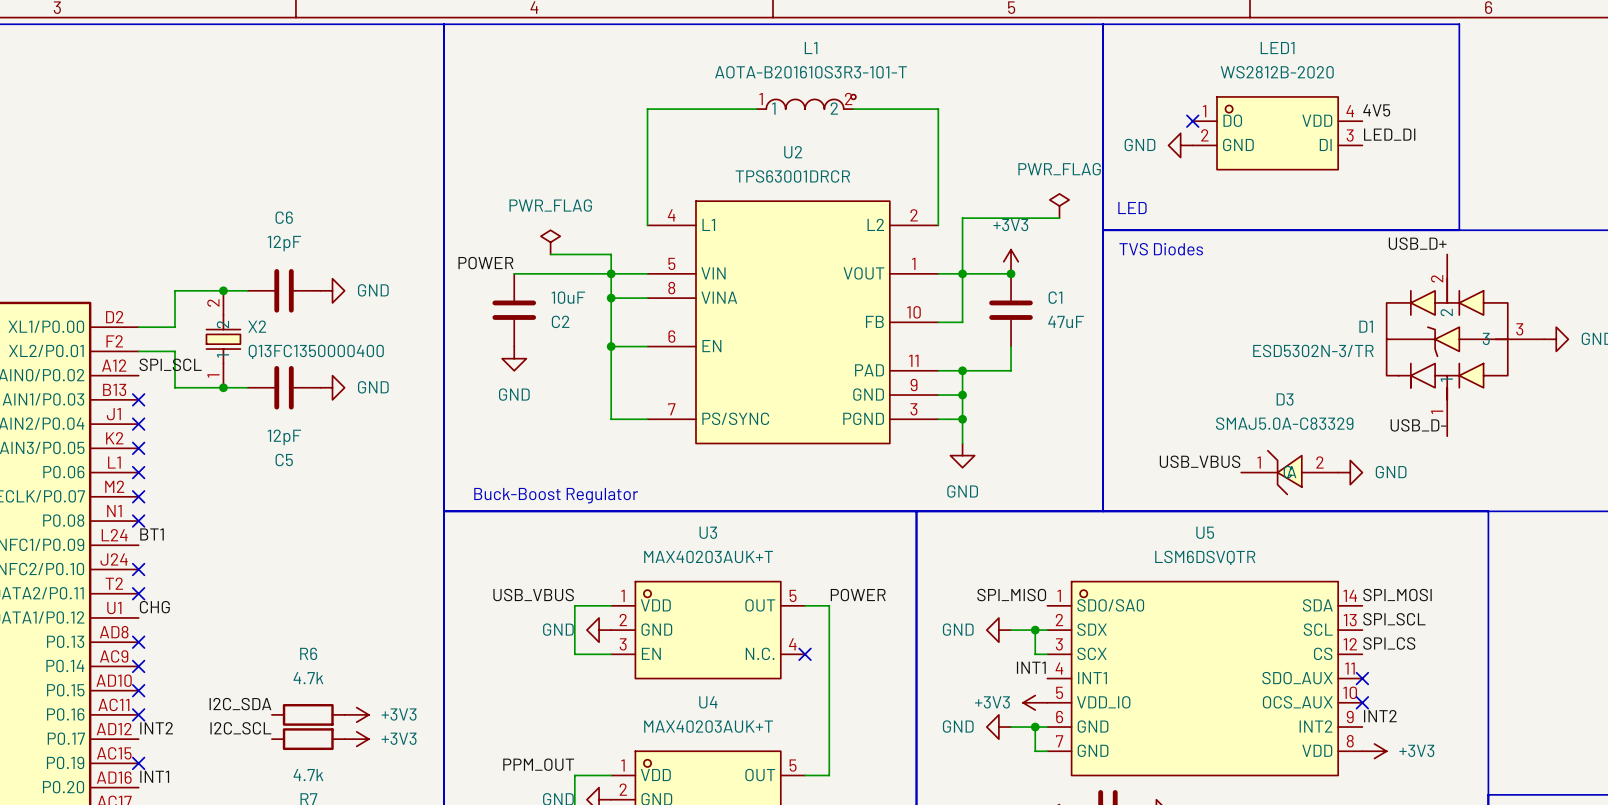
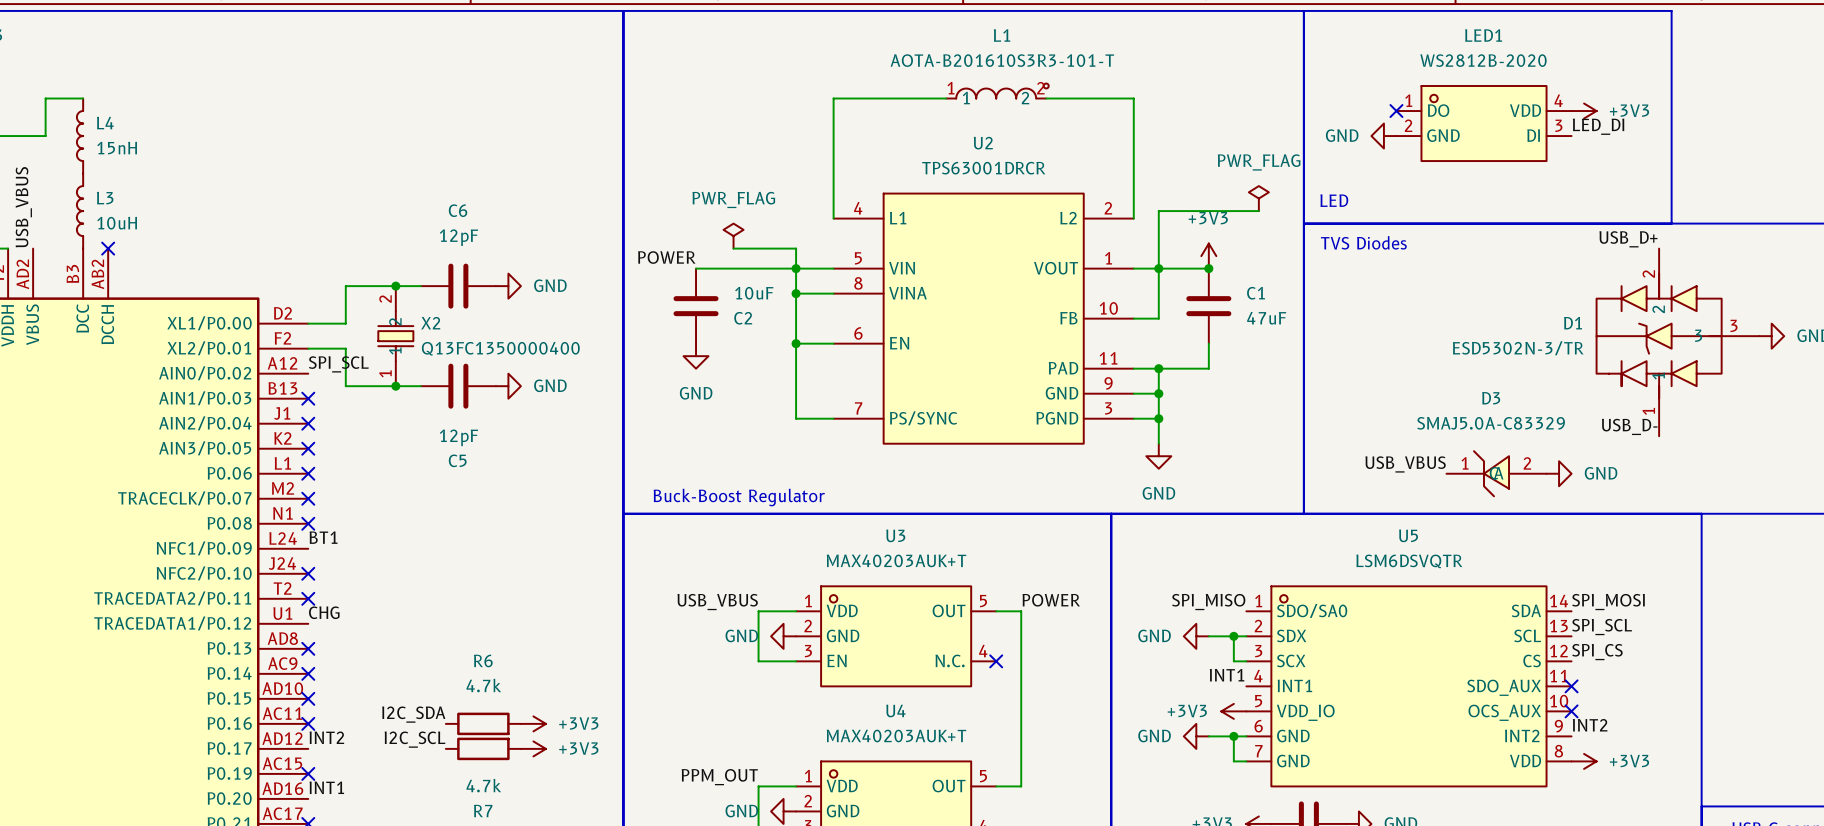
label: 4V5 (1376, 110) -> none
power symbol: none -> +3V3 (1584, 111)

